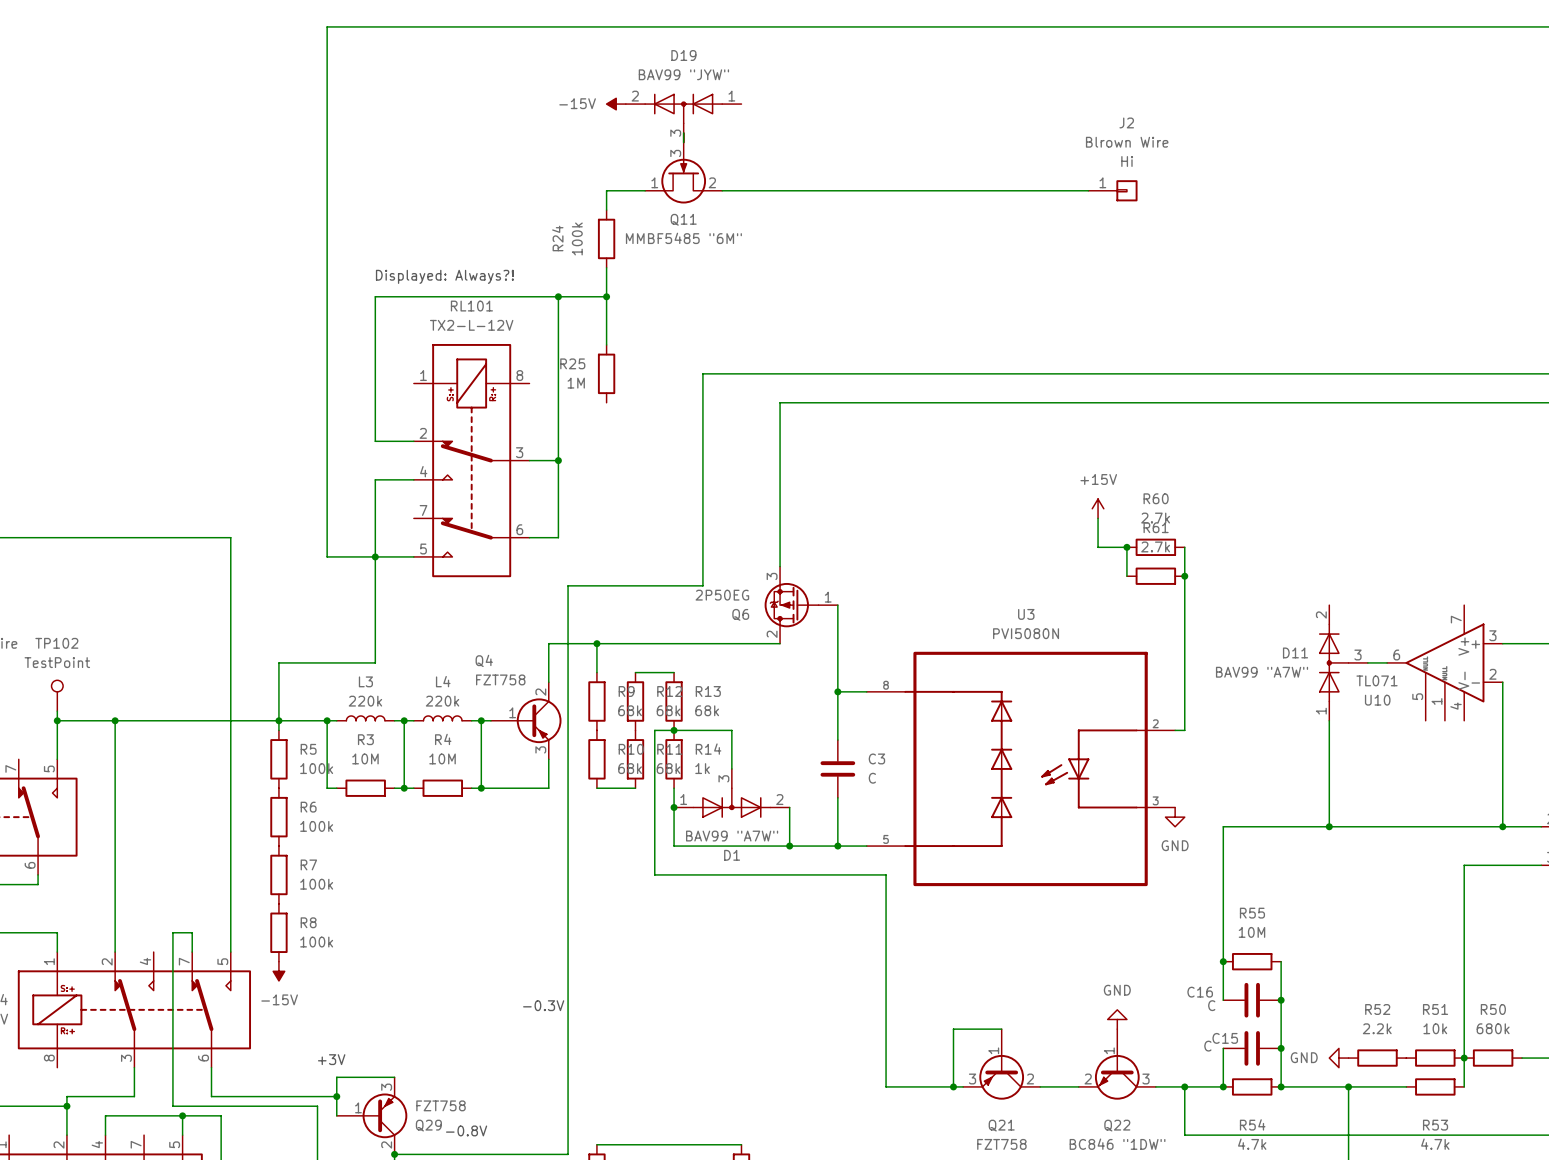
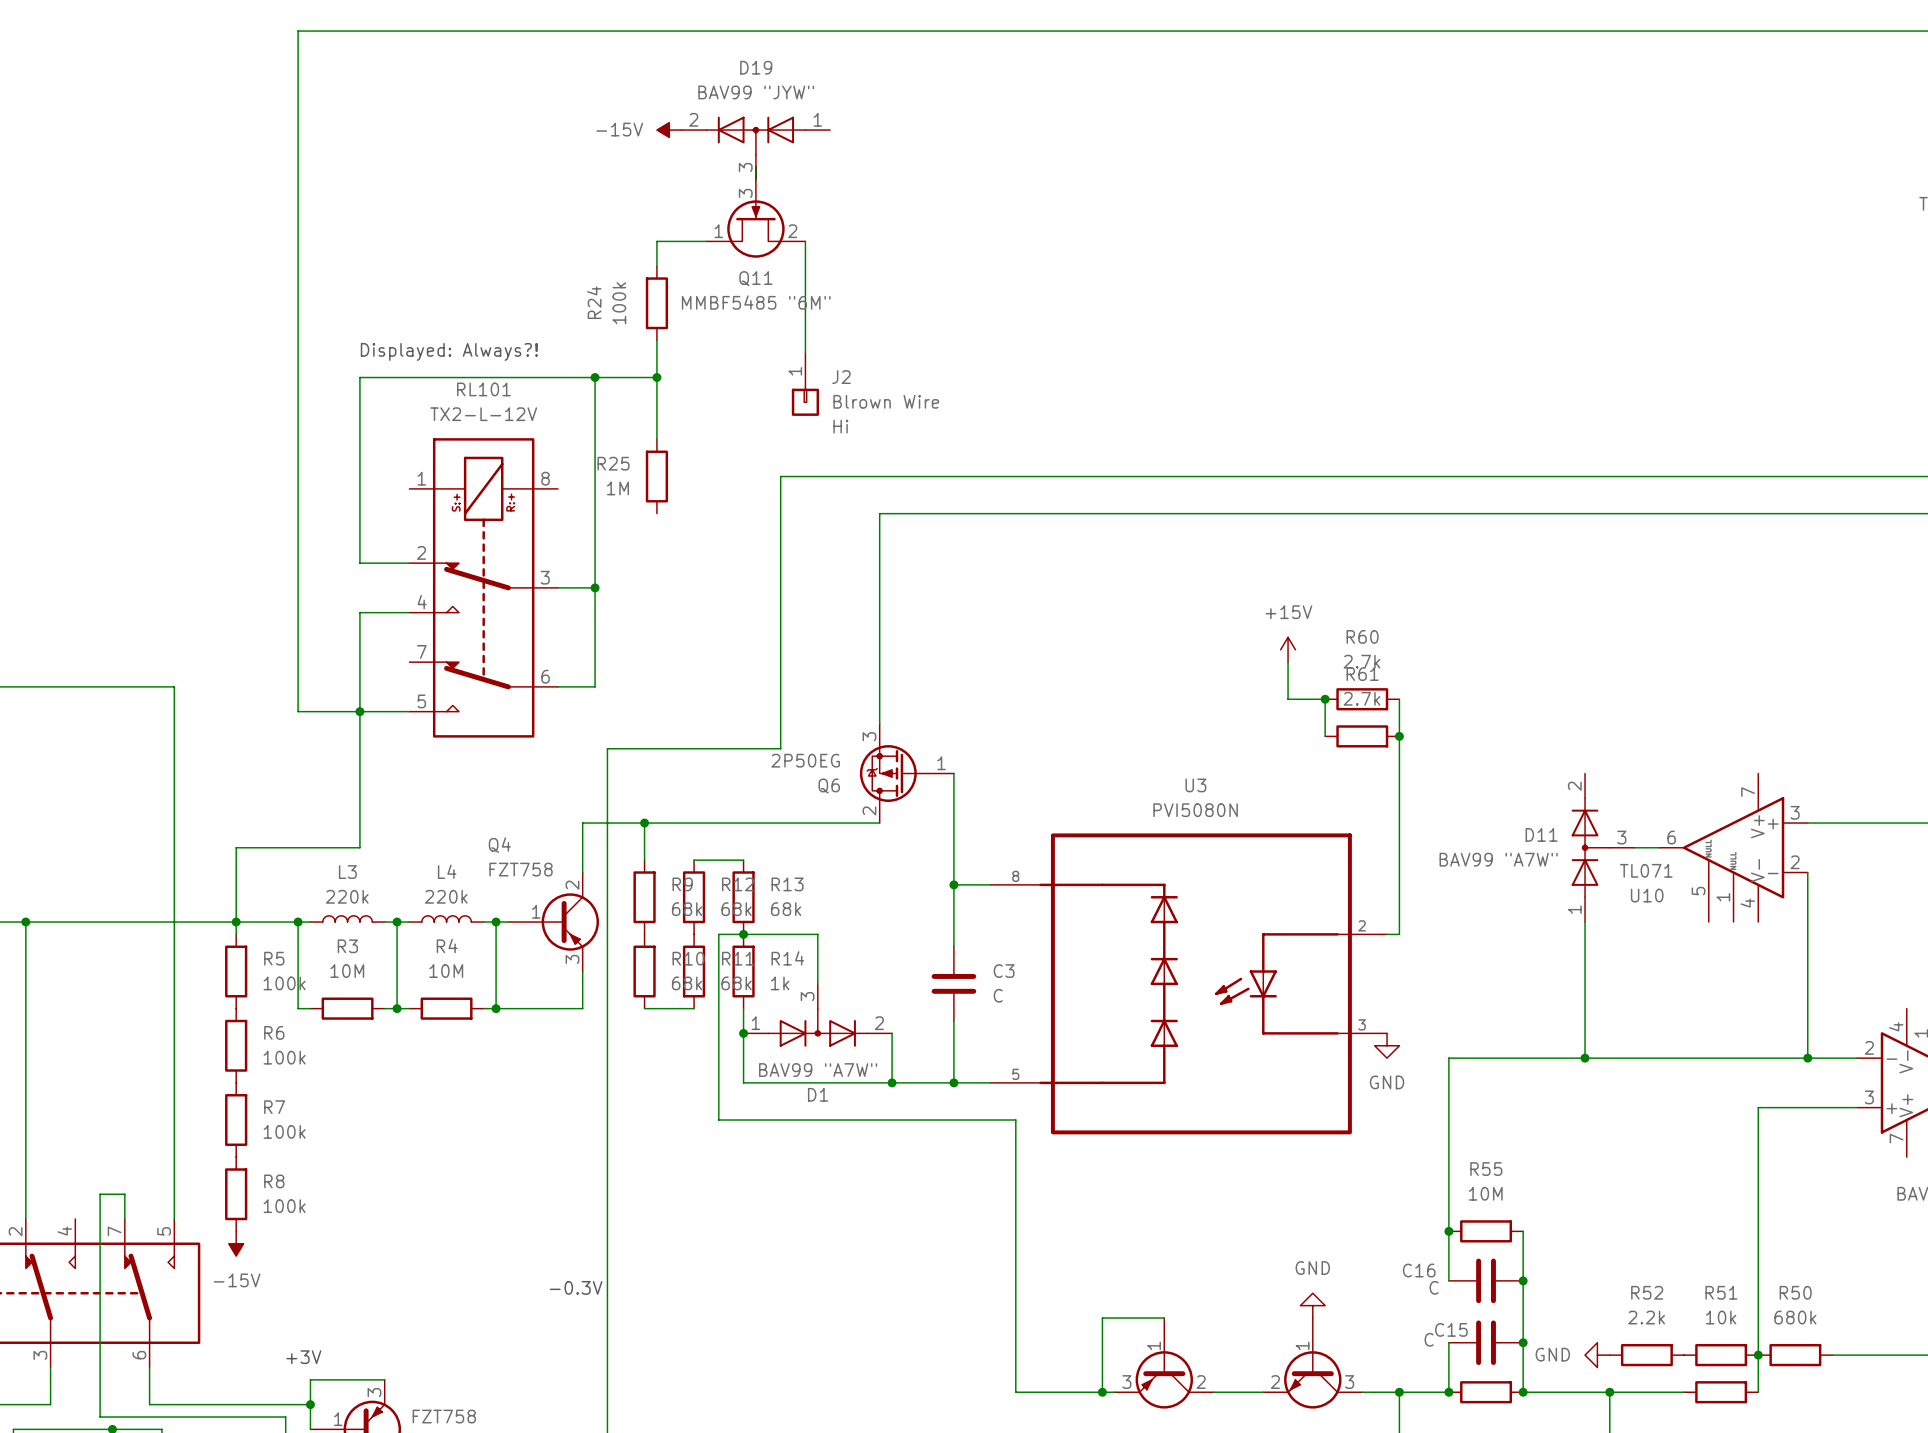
J2 name position: J2 (1126, 122) -> J2 (841, 377)
J2 value position: Blrown Wire (1127, 142) -> Blrown Wire (886, 401)
J2 text position: Hi (1127, 161) -> Hi (840, 426)
wire: (722, 190) (1088, 190) -> (805, 241) (805, 352)
J2 position: (1112, 190) -> (805, 384)
J2 rotation: 0° (1126, 190) -> 90° clockwise (805, 402)

